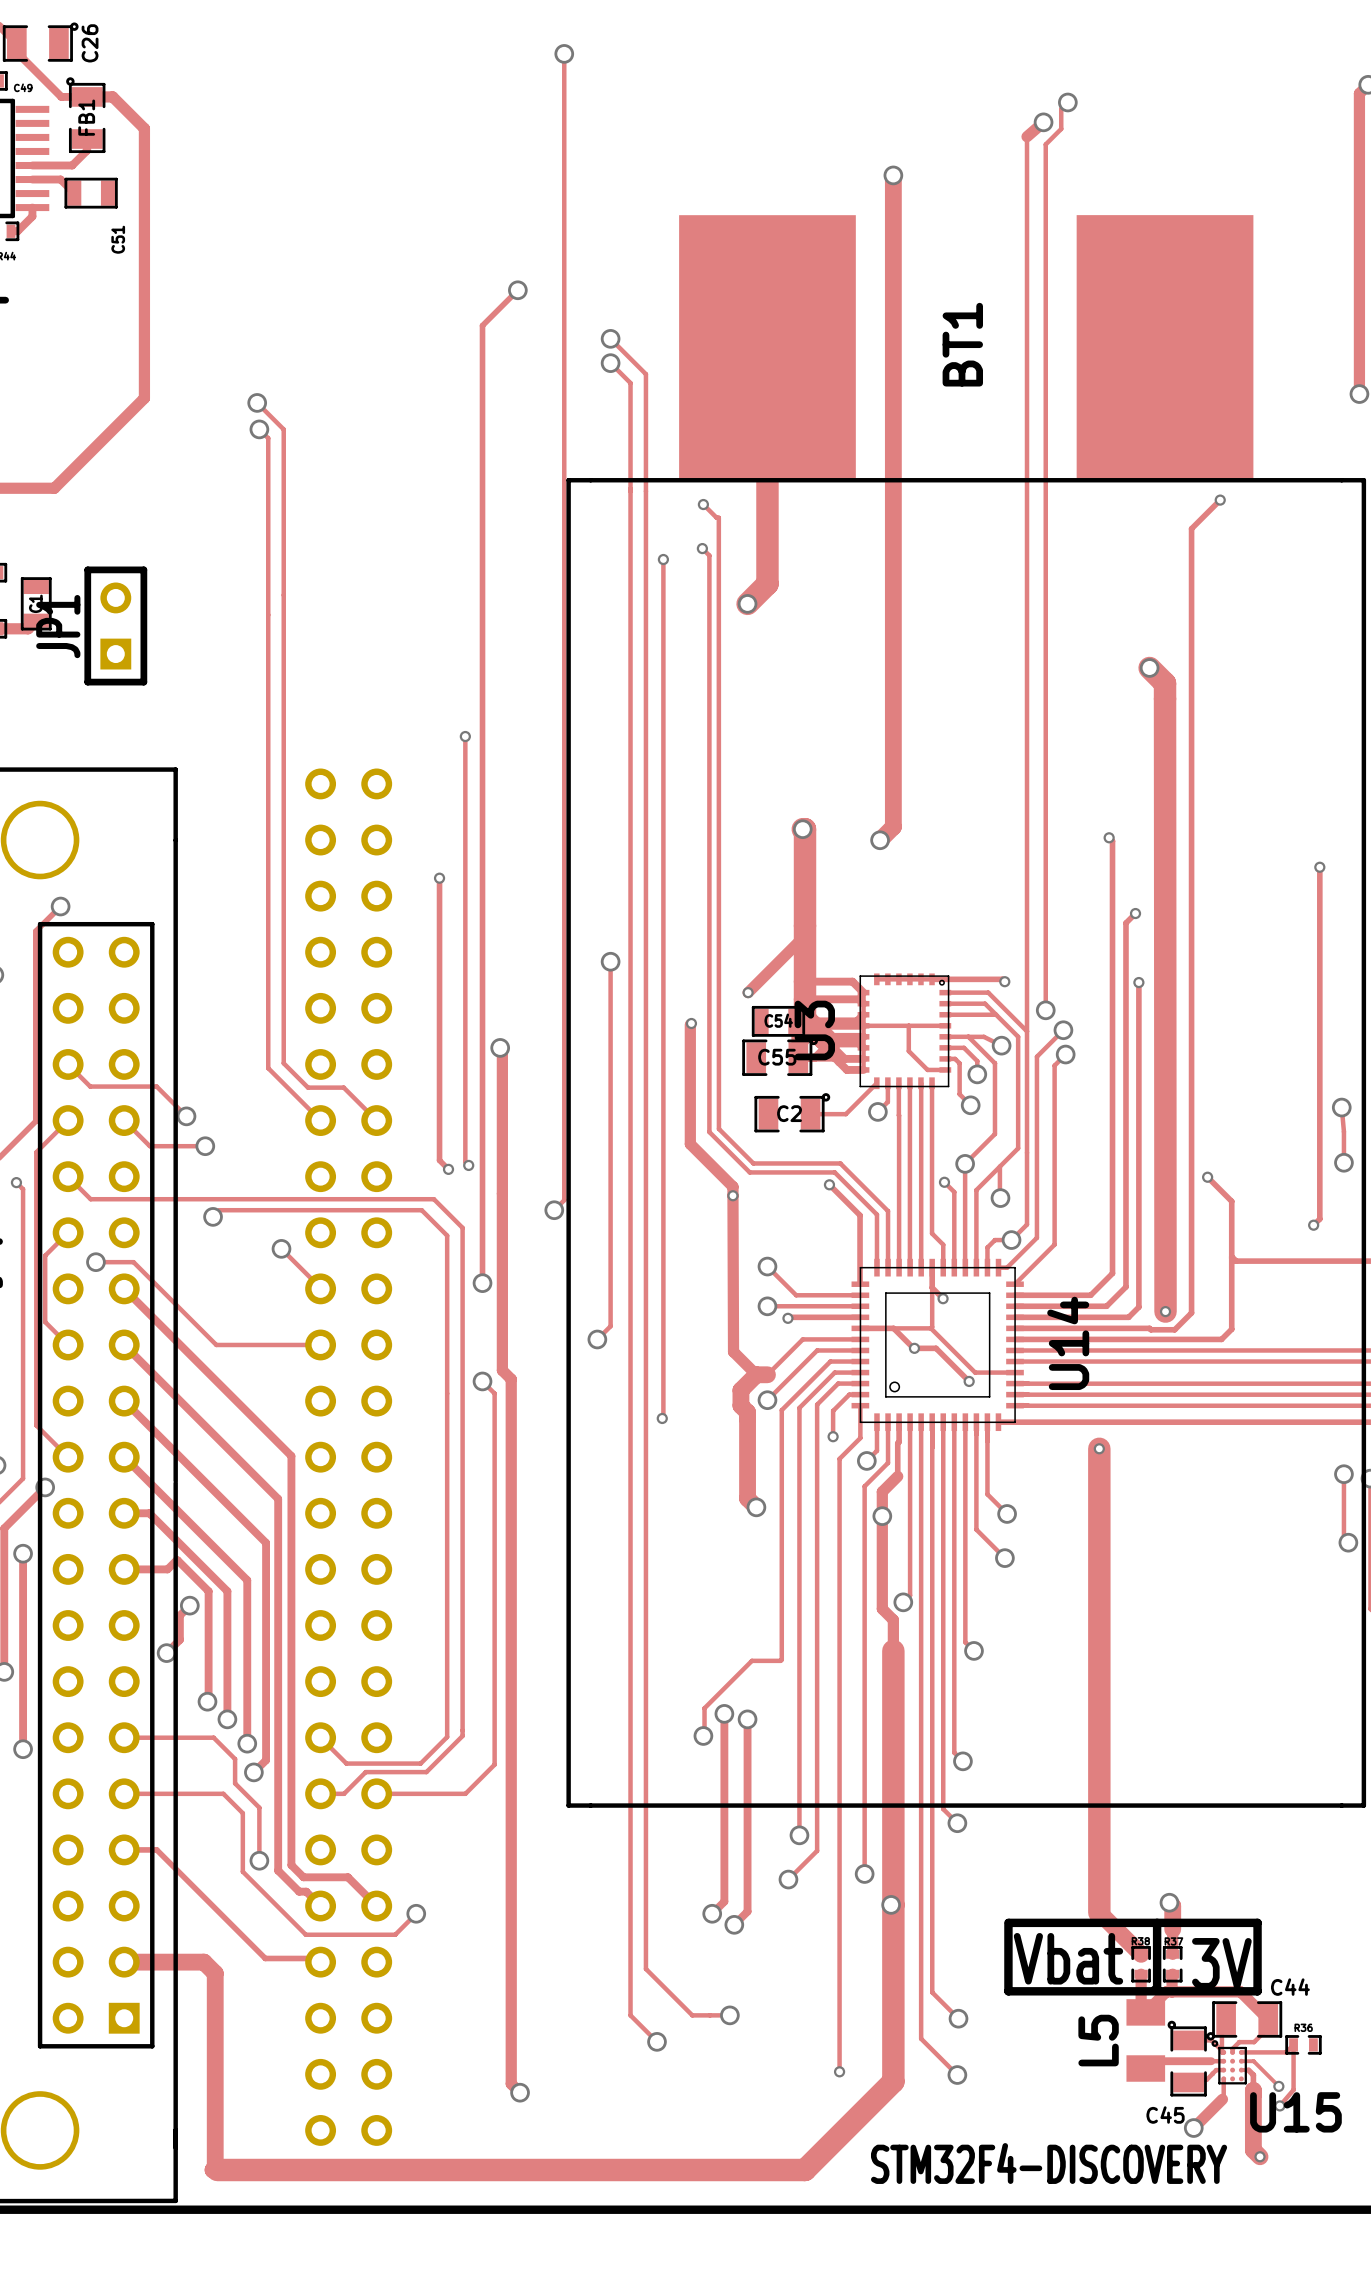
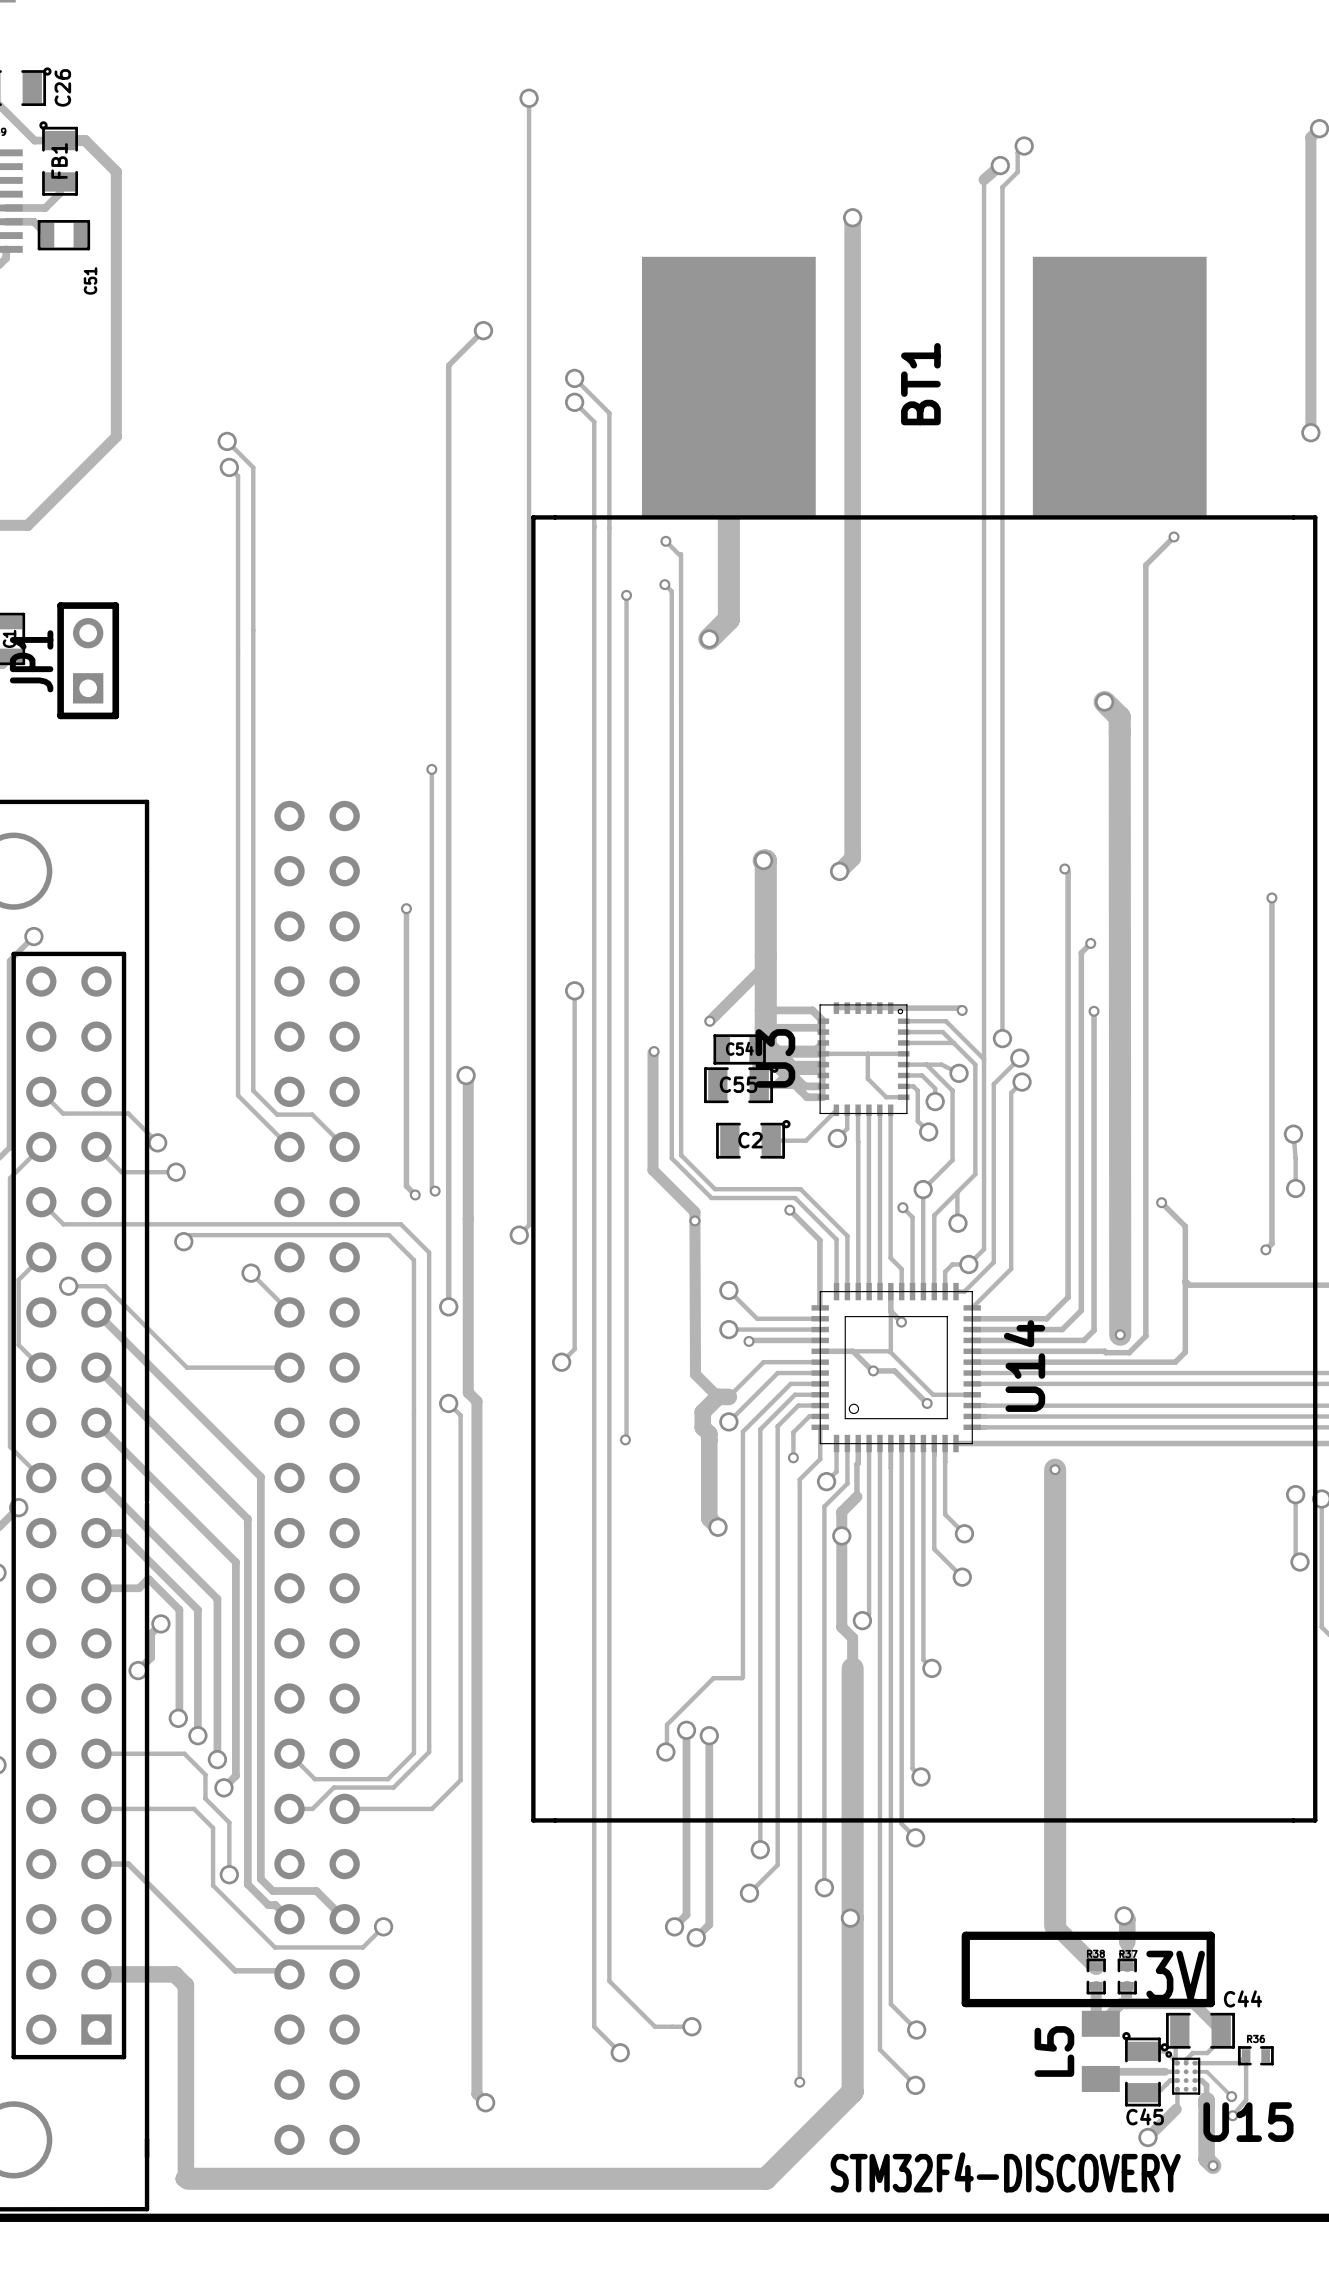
line: (1157, 1922) (1157, 1989) (1154, 1989) -> none
text: Vbat (1068, 1958) -> none
C45 name position: C45 (1165, 2115) -> C45 (1145, 2116)

